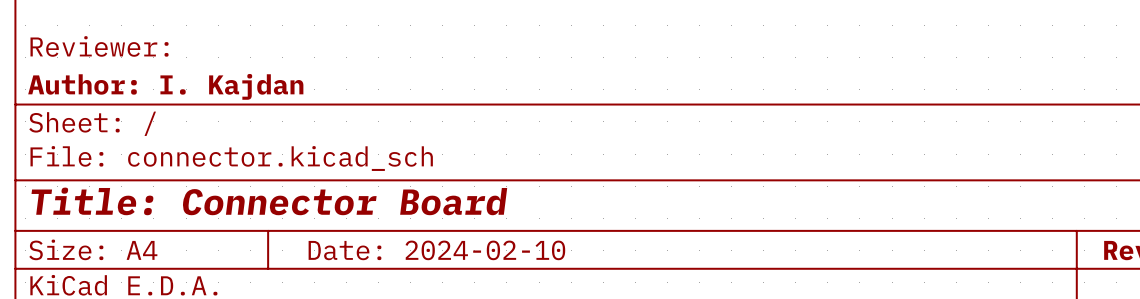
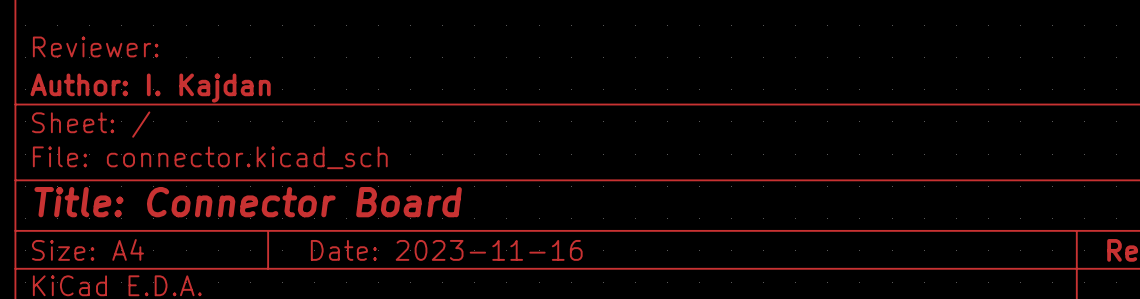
title block: Date: 2024-02-10 (436, 250) -> Date: 2023-11-16 (446, 250)

